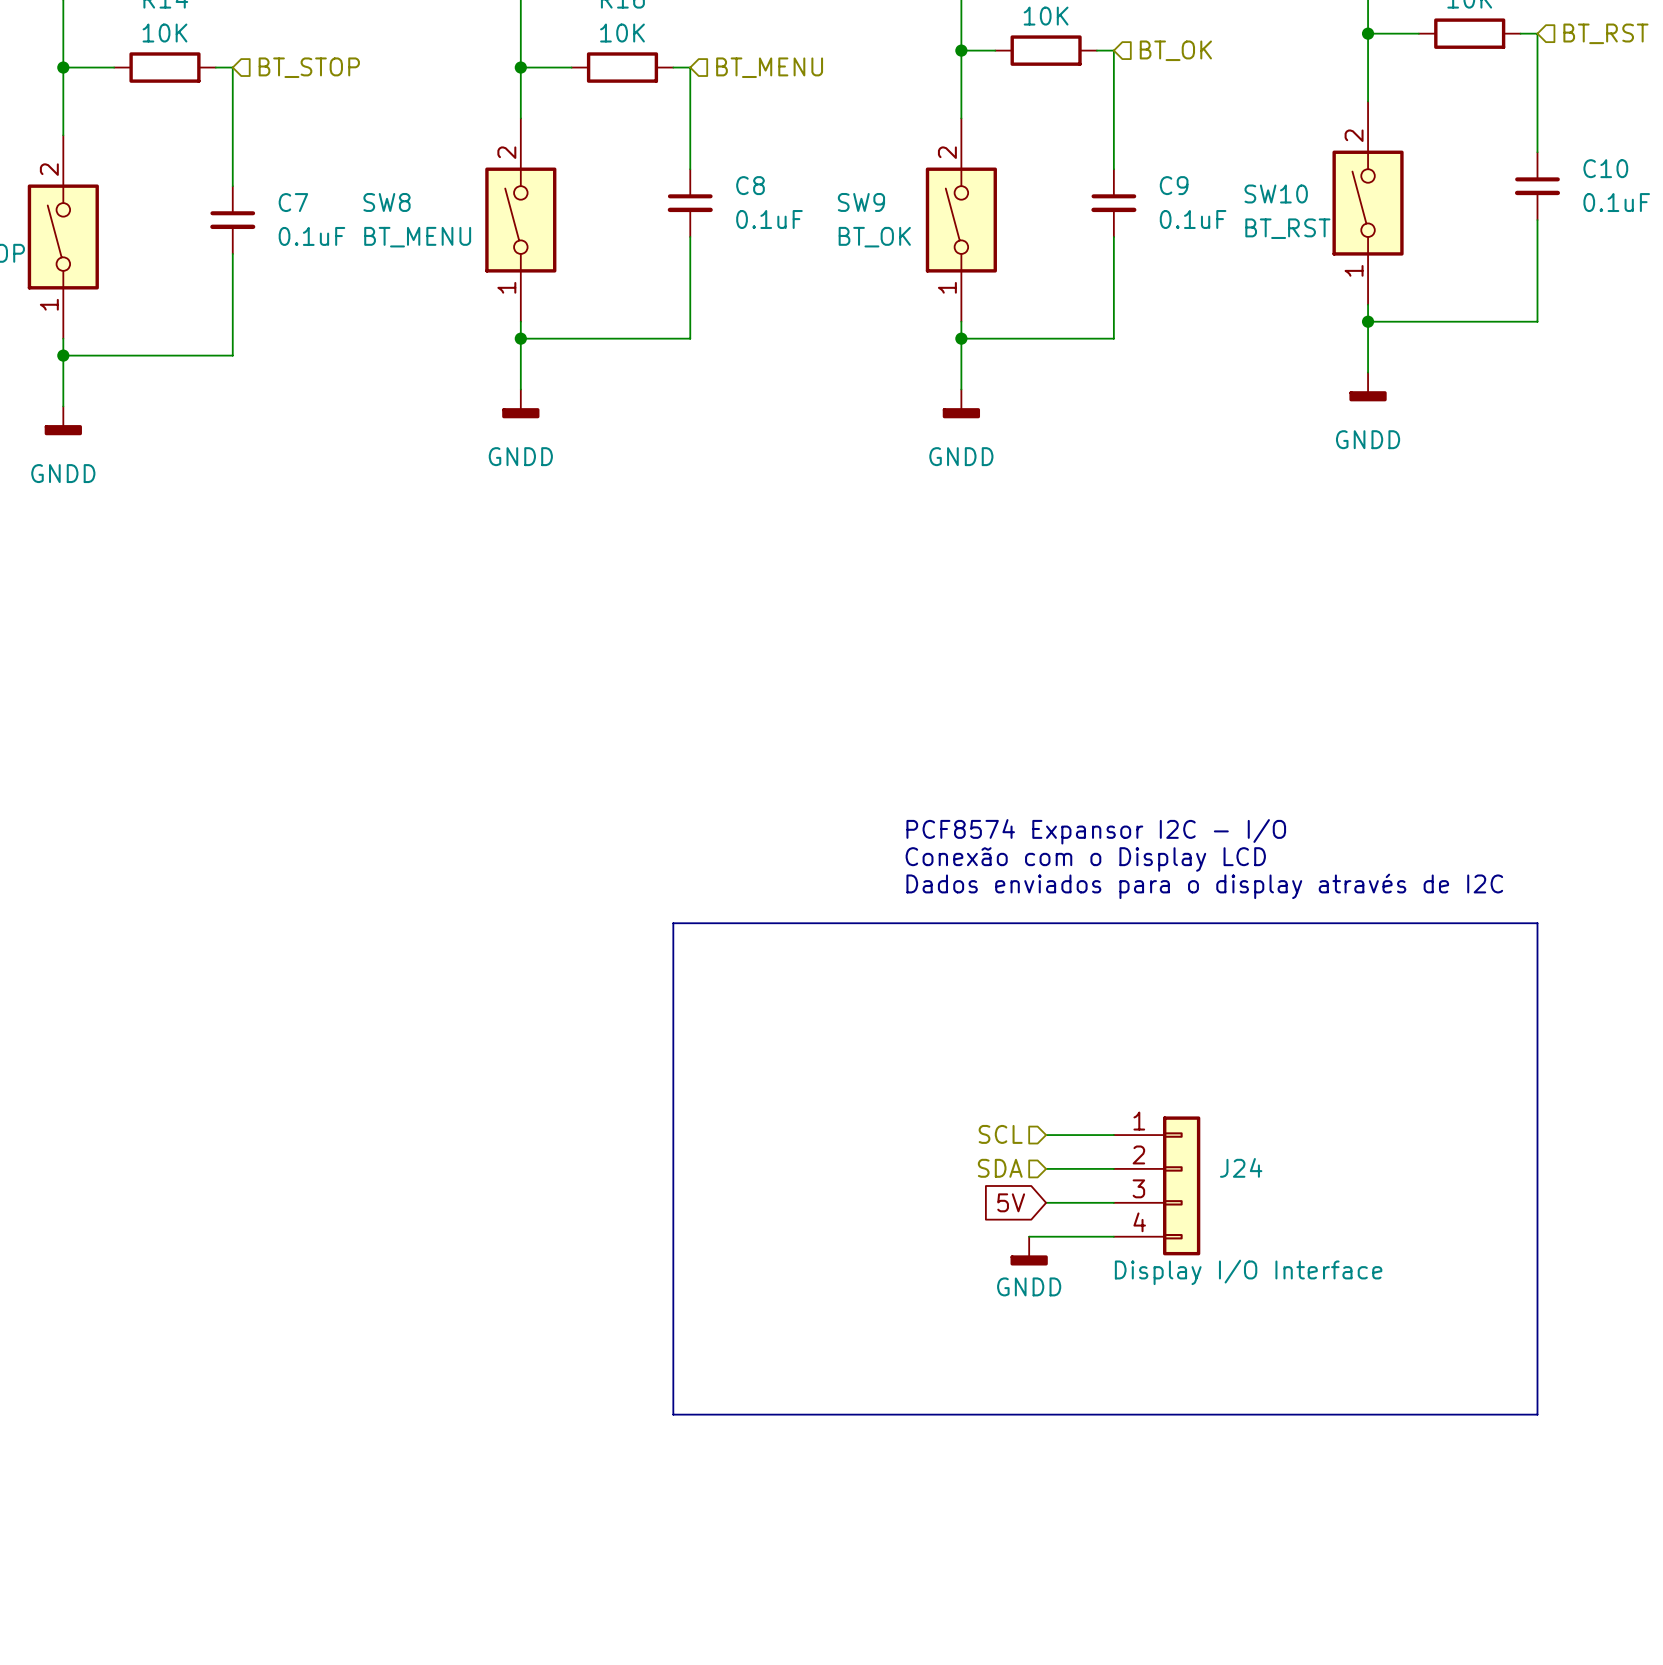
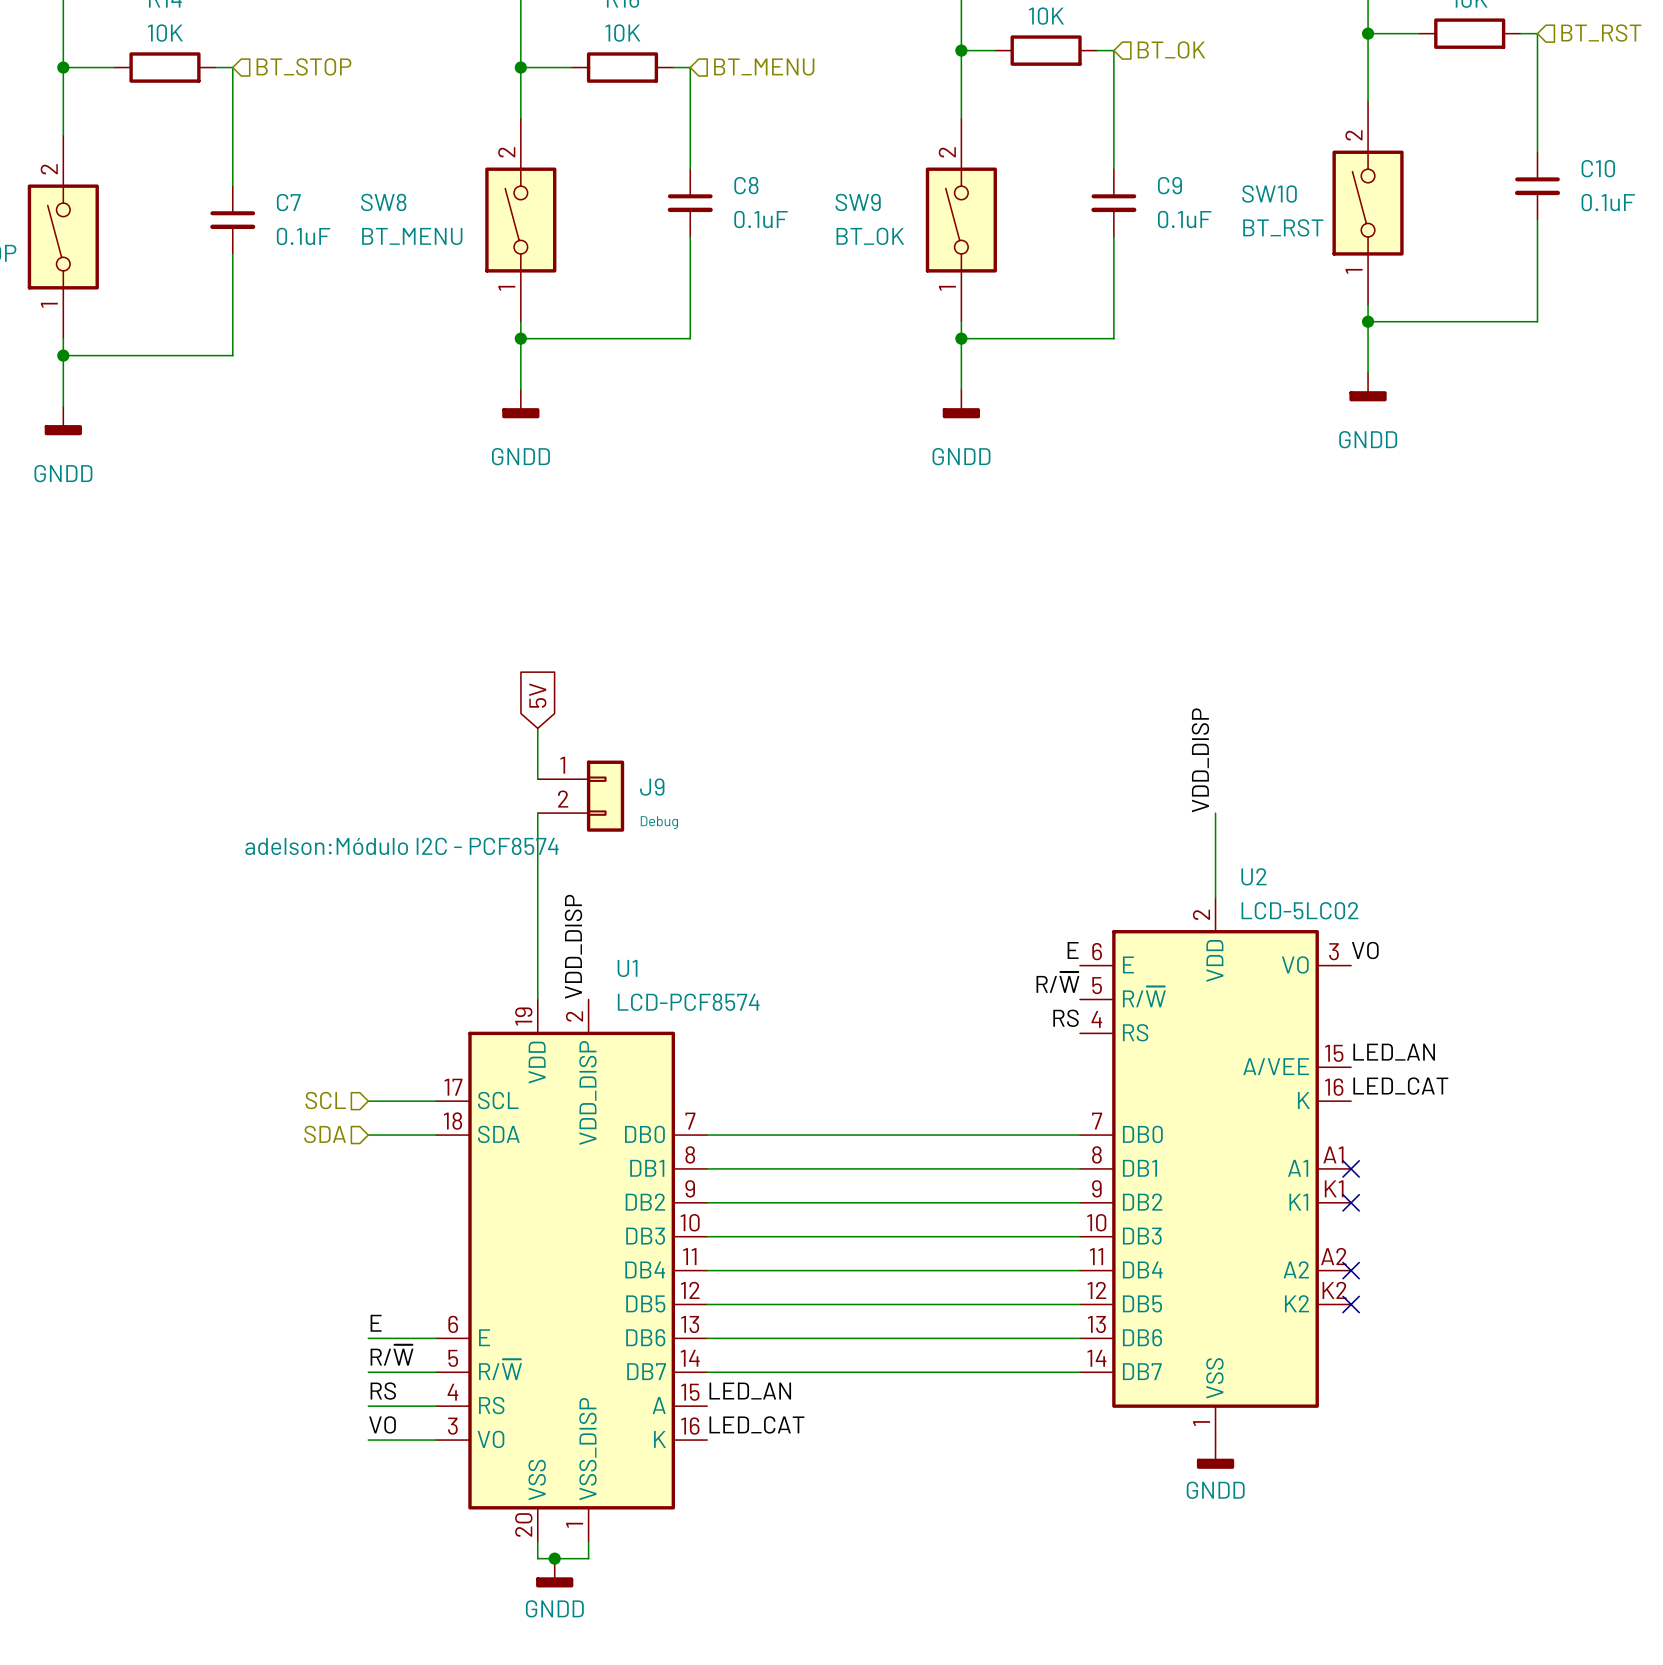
global label: none -> 5V (537, 695)
wire: none -> (537, 728) (537, 779)
label: none -> VDD_DISP (1200, 760)
J9: none -> Debug (580, 796)
wire: none -> (537, 813) (537, 999)
wire: none -> (1215, 813) (1215, 897)
text: PCF8574 Expansor I2C - I/O (1096, 831) -> none
text: Conexão com o Display LCD (1085, 859) -> none
text: Dados enviados para o display através de I2C (1204, 886) -> none
line: (673, 923) (1537, 923) (1537, 1414) (673, 1414) (673, 923) -> none
label: none -> VDD_DISP (573, 946)
label: none -> E (1073, 950)
label: none -> VO (1365, 950)
label: none -> R/~{W} (1057, 982)
label: none -> RS (1066, 1018)
label: none -> LED_AN (1394, 1052)
label: none -> LED_CAT (1400, 1086)
hierarchical label: none -> SCL (325, 1100)
wire: none -> (368, 1101) (436, 1101)
hierarchical label: none -> SDA (325, 1134)
hierarchical label: SCL (1000, 1134) -> none
wire: none -> (368, 1135) (436, 1135)
wire: none -> (707, 1135) (1046, 1135)
wire: none -> (707, 1168) (1046, 1168)
hierarchical label: SDA (1000, 1168) -> none
U2: none -> LCD-5LC02 (1215, 1168)
no-connect mark: none -> (1351, 1168)
J24: Display I/O Interface (1157, 1185) -> none
wire: none -> (707, 1202) (1046, 1202)
global label: 5V (1011, 1202) -> none
no-connect mark: none -> (1351, 1202)
wire: none -> (707, 1236) (1029, 1236)
power symbol position: GNDD (1029, 1251) -> GNDD (1215, 1454)
U1: none -> LCD-PCF8574 (571, 1270)
wire: none -> (707, 1270) (1079, 1270)
no-connect mark: none -> (1351, 1270)
wire: none -> (707, 1304) (1079, 1304)
no-connect mark: none -> (1351, 1304)
label: none -> E (376, 1323)
wire: none -> (368, 1338) (436, 1338)
wire: none -> (707, 1338) (1079, 1338)
label: none -> R/~{W} (392, 1355)
wire: none -> (368, 1372) (436, 1372)
wire: none -> (707, 1372) (1079, 1372)
label: none -> RS (383, 1391)
label: none -> LED_AN (750, 1391)
wire: none -> (368, 1406) (436, 1406)
label: none -> VO (382, 1424)
label: none -> LED_CAT (756, 1424)
wire: none -> (368, 1440) (436, 1440)
wire: none -> (537, 1541) (537, 1558) (588, 1558) (588, 1541)
junction: none -> (554, 1558)
power symbol: none -> GNDD (554, 1573)

